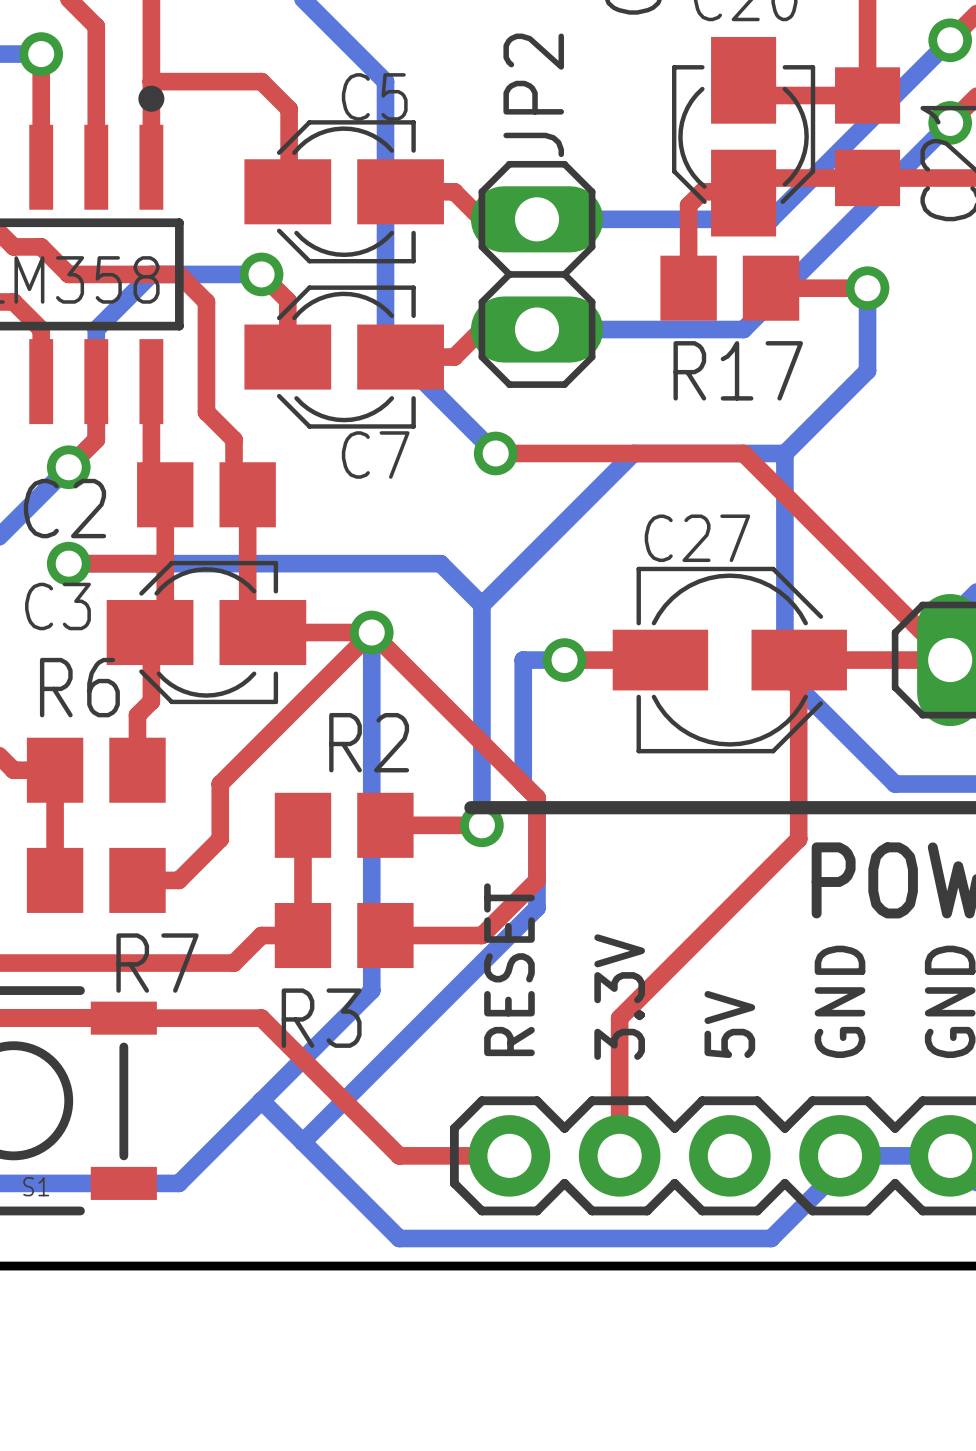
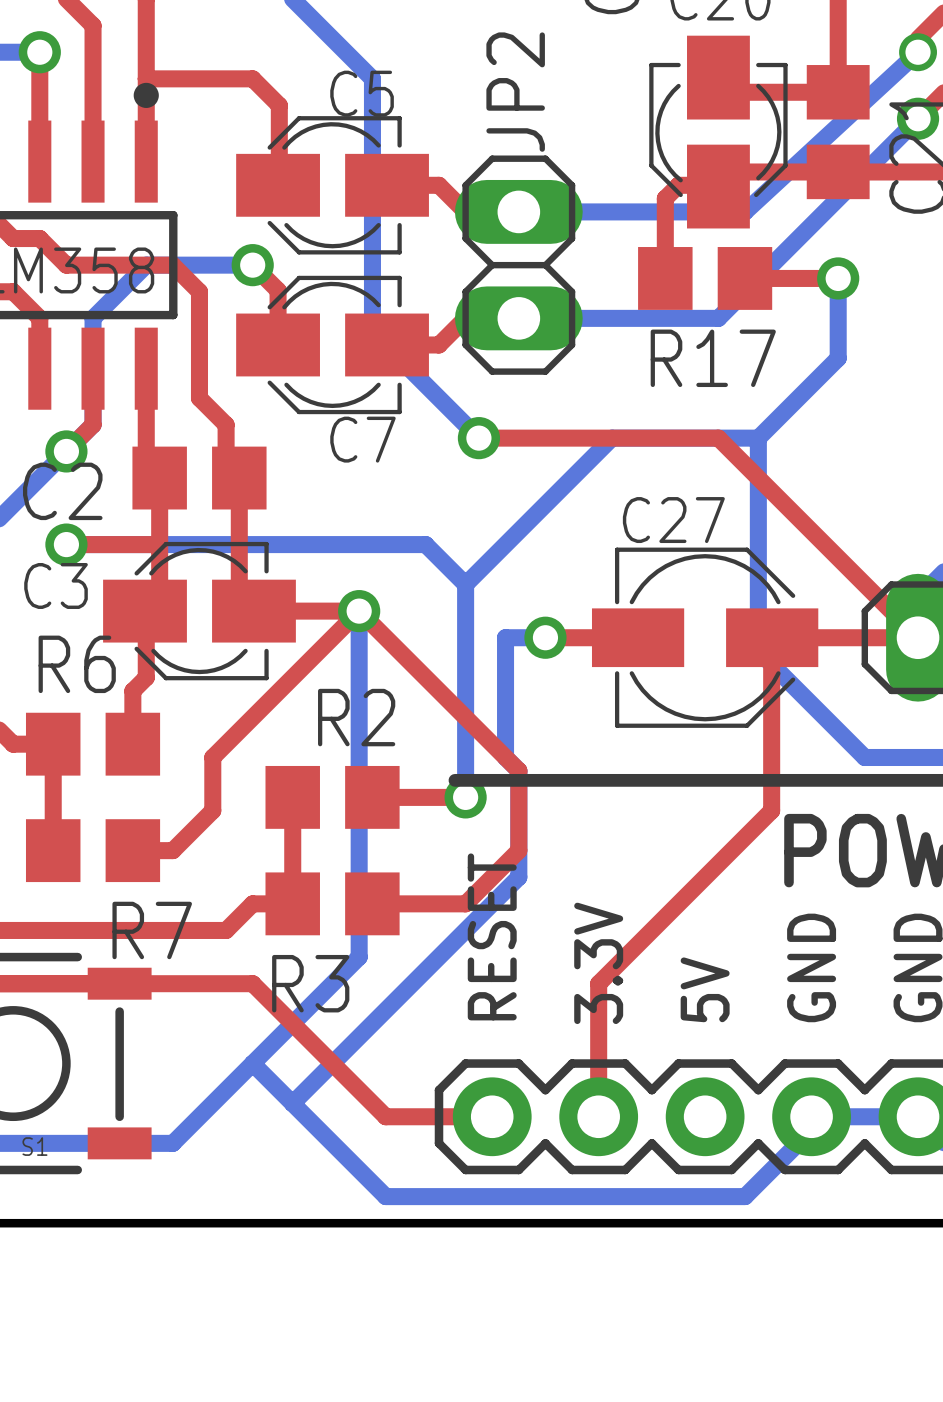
bottom track: (950, 40) (771, 219) -> (918, 52) (745, 211)
via position: (950, 40) -> (918, 52)

